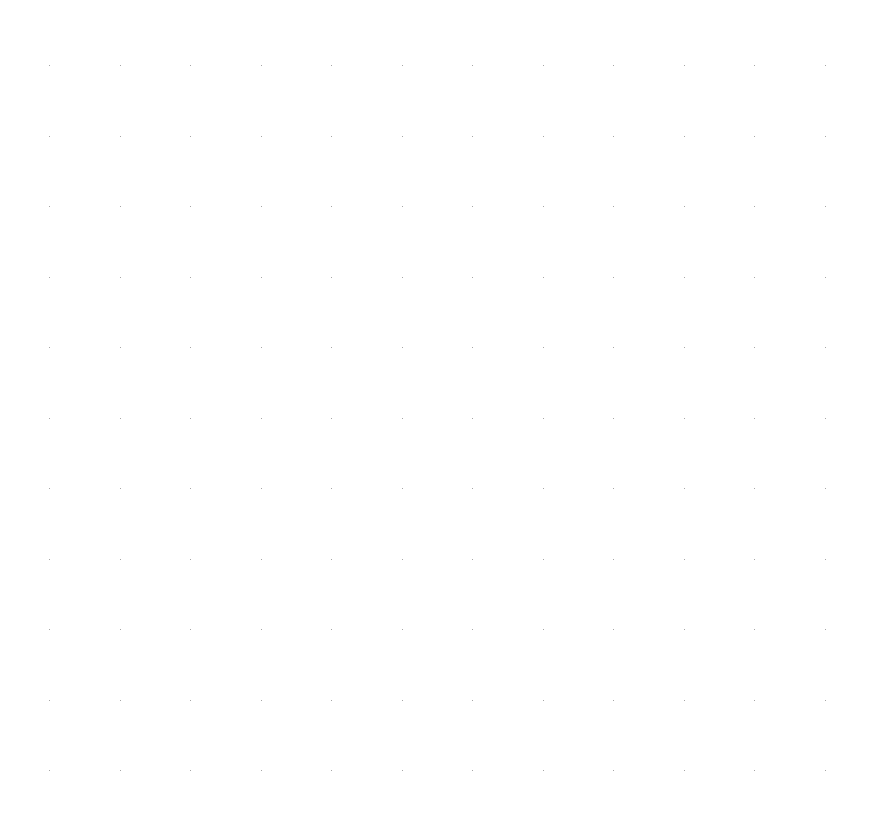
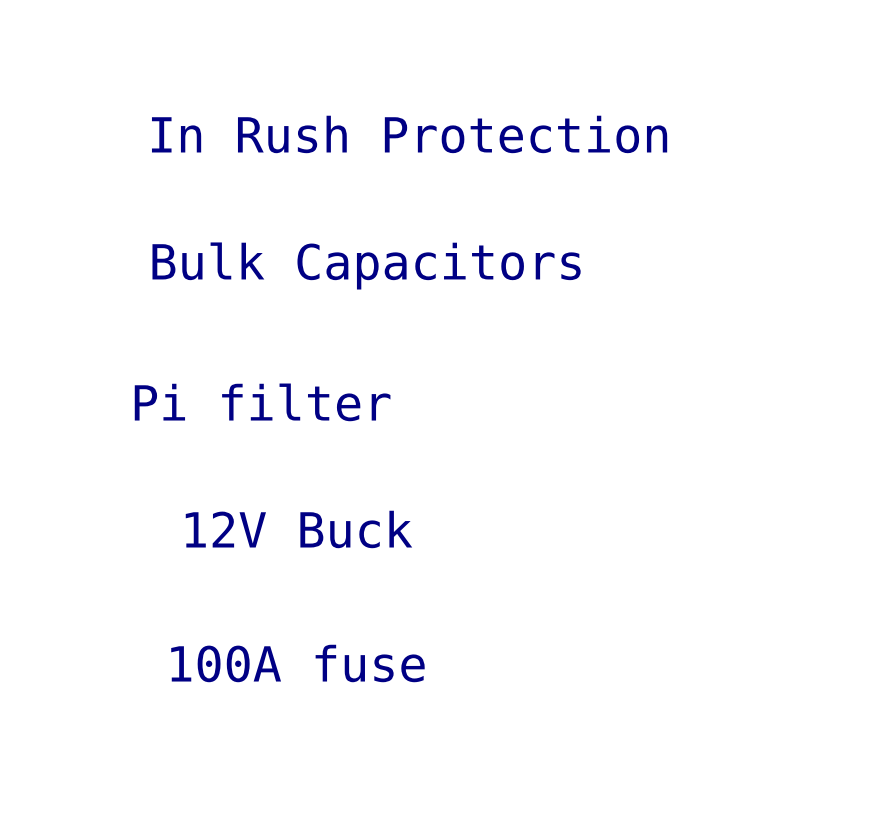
text: none -> In Rush Protection (409, 134)
text: none -> Bulk Capacitors (366, 265)
text: none -> Pi filter (262, 402)
text: none -> 12V Buck (299, 529)
text: none -> 100A fuse (297, 663)

